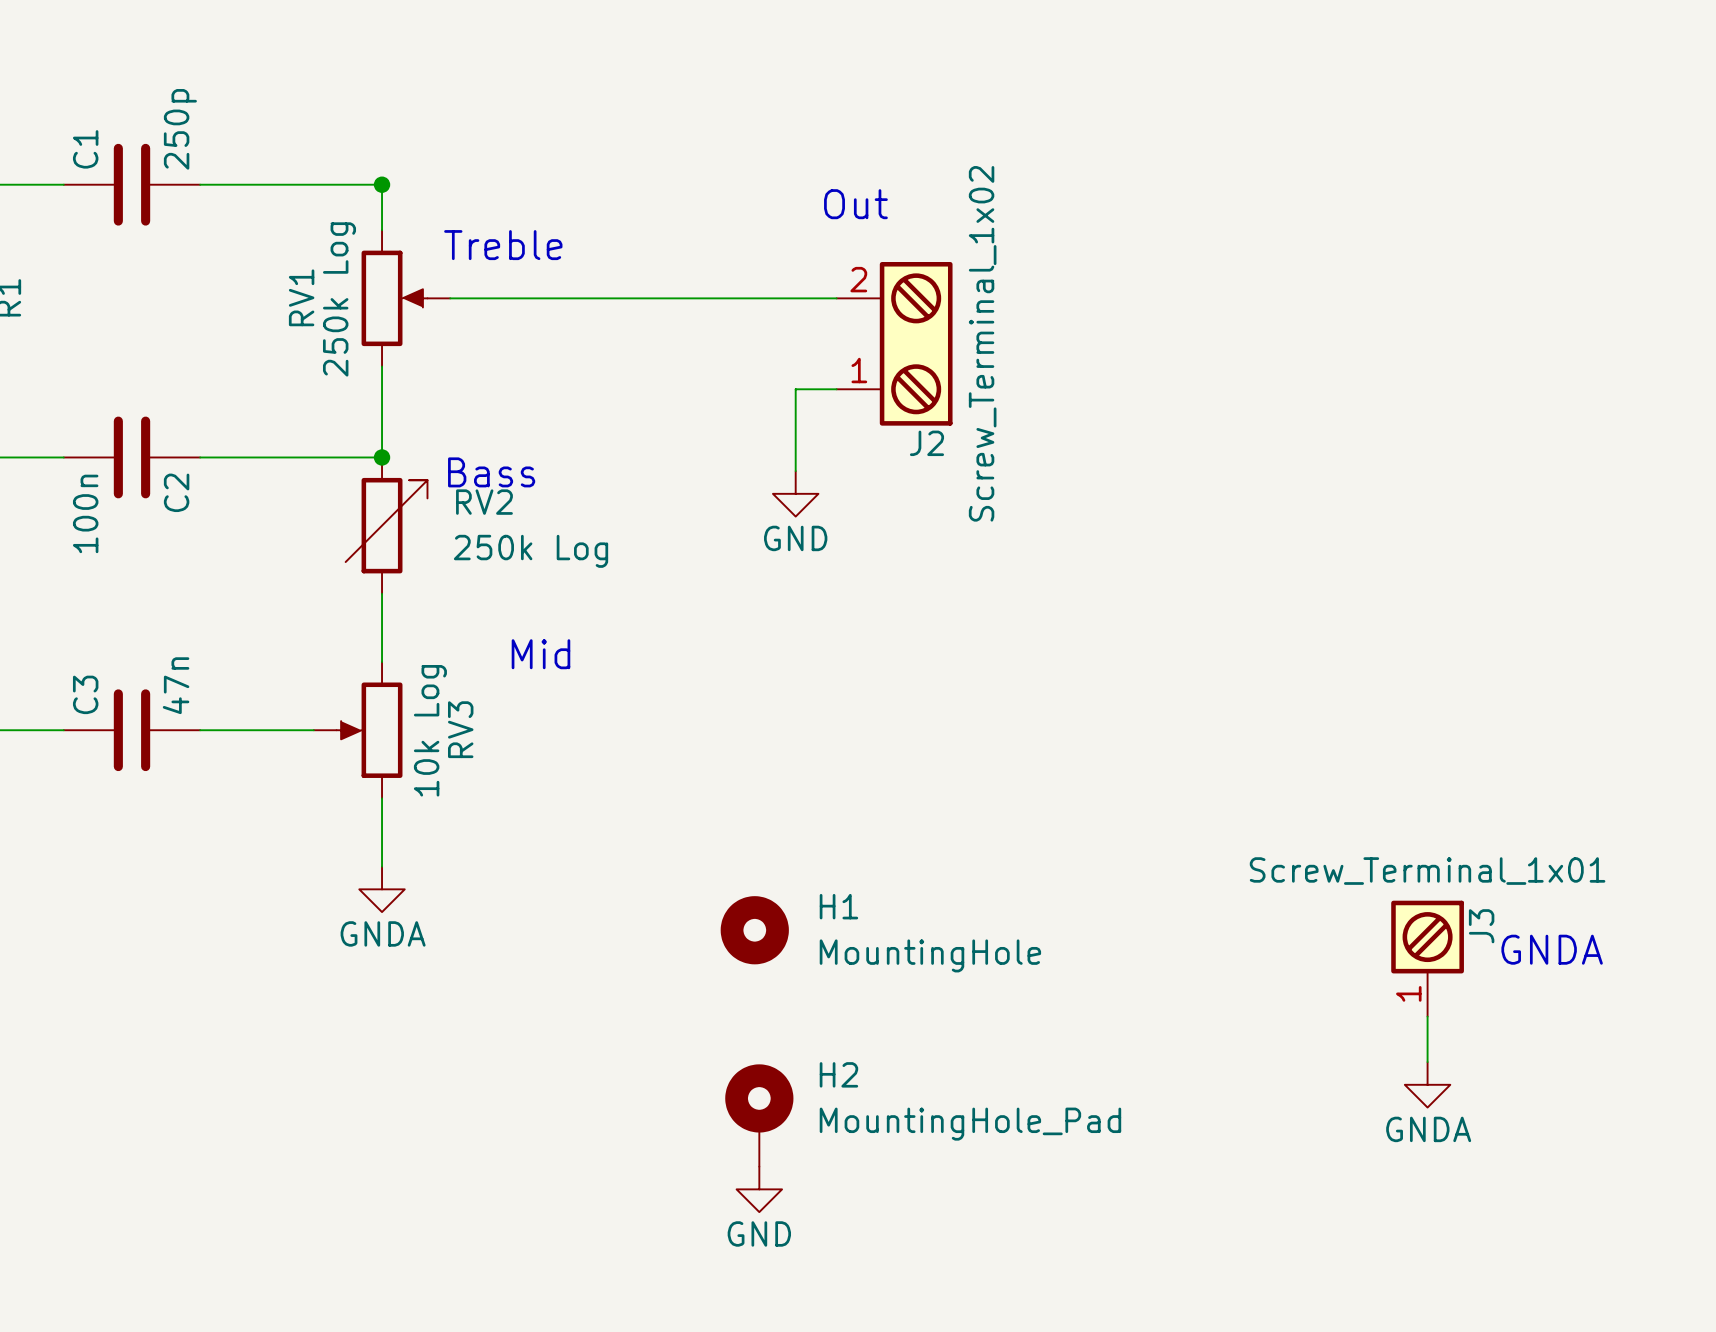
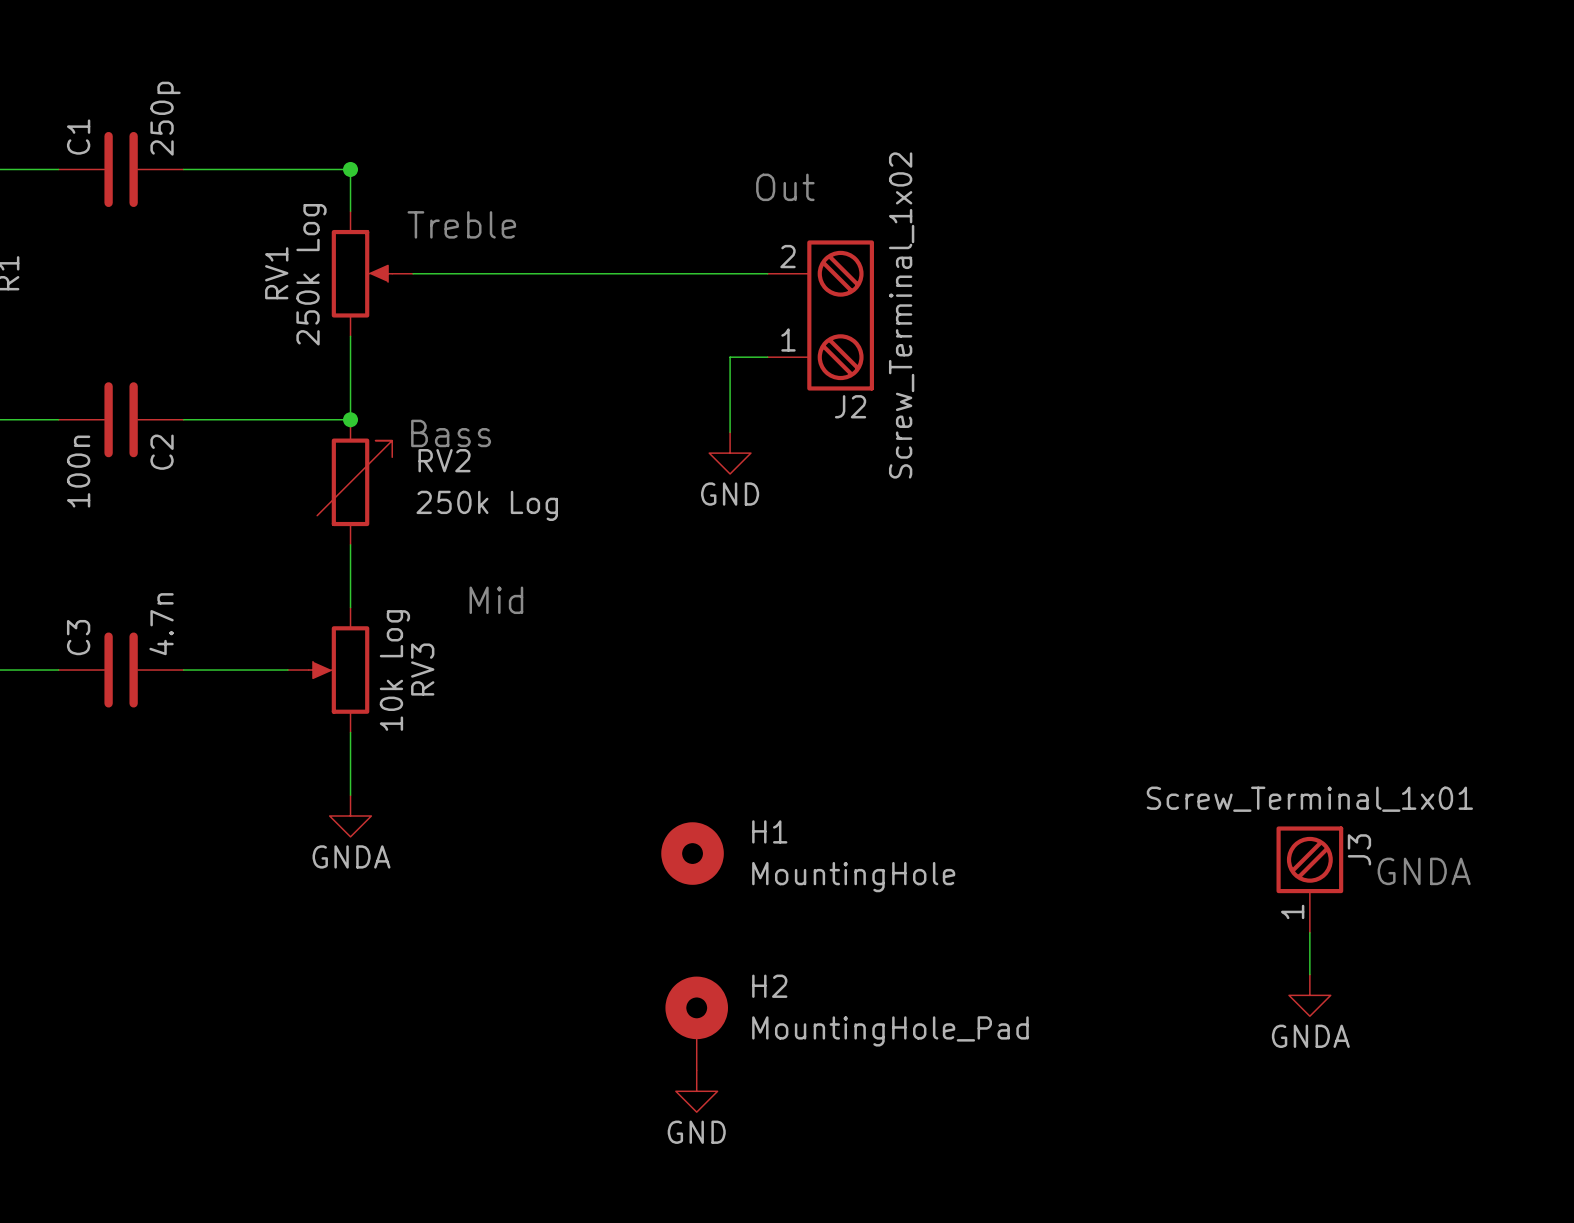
C3 value: 47n (176, 685) -> 4.7n (161, 624)

